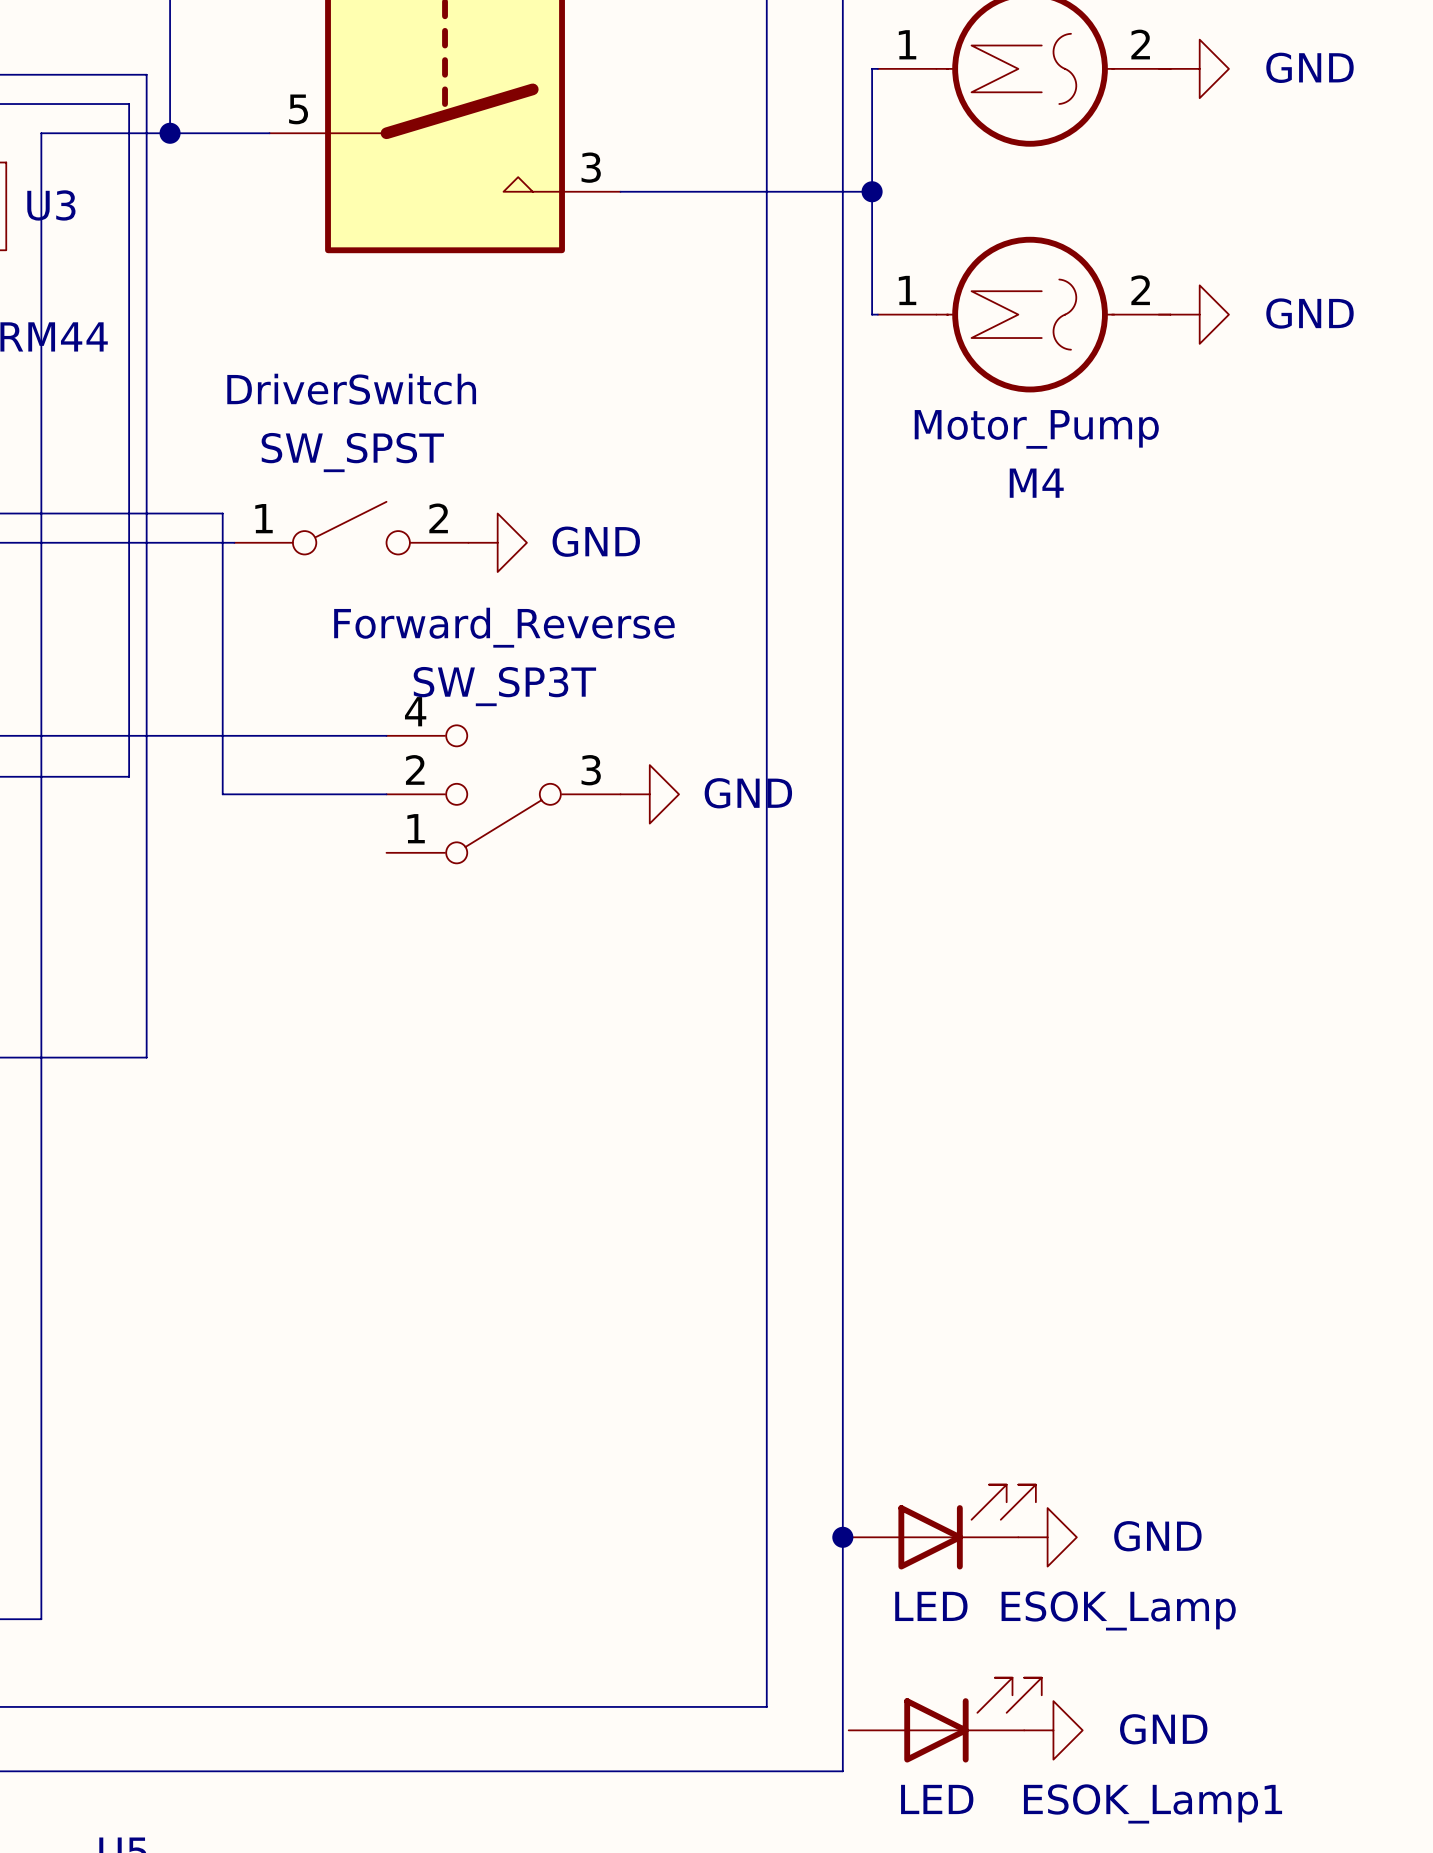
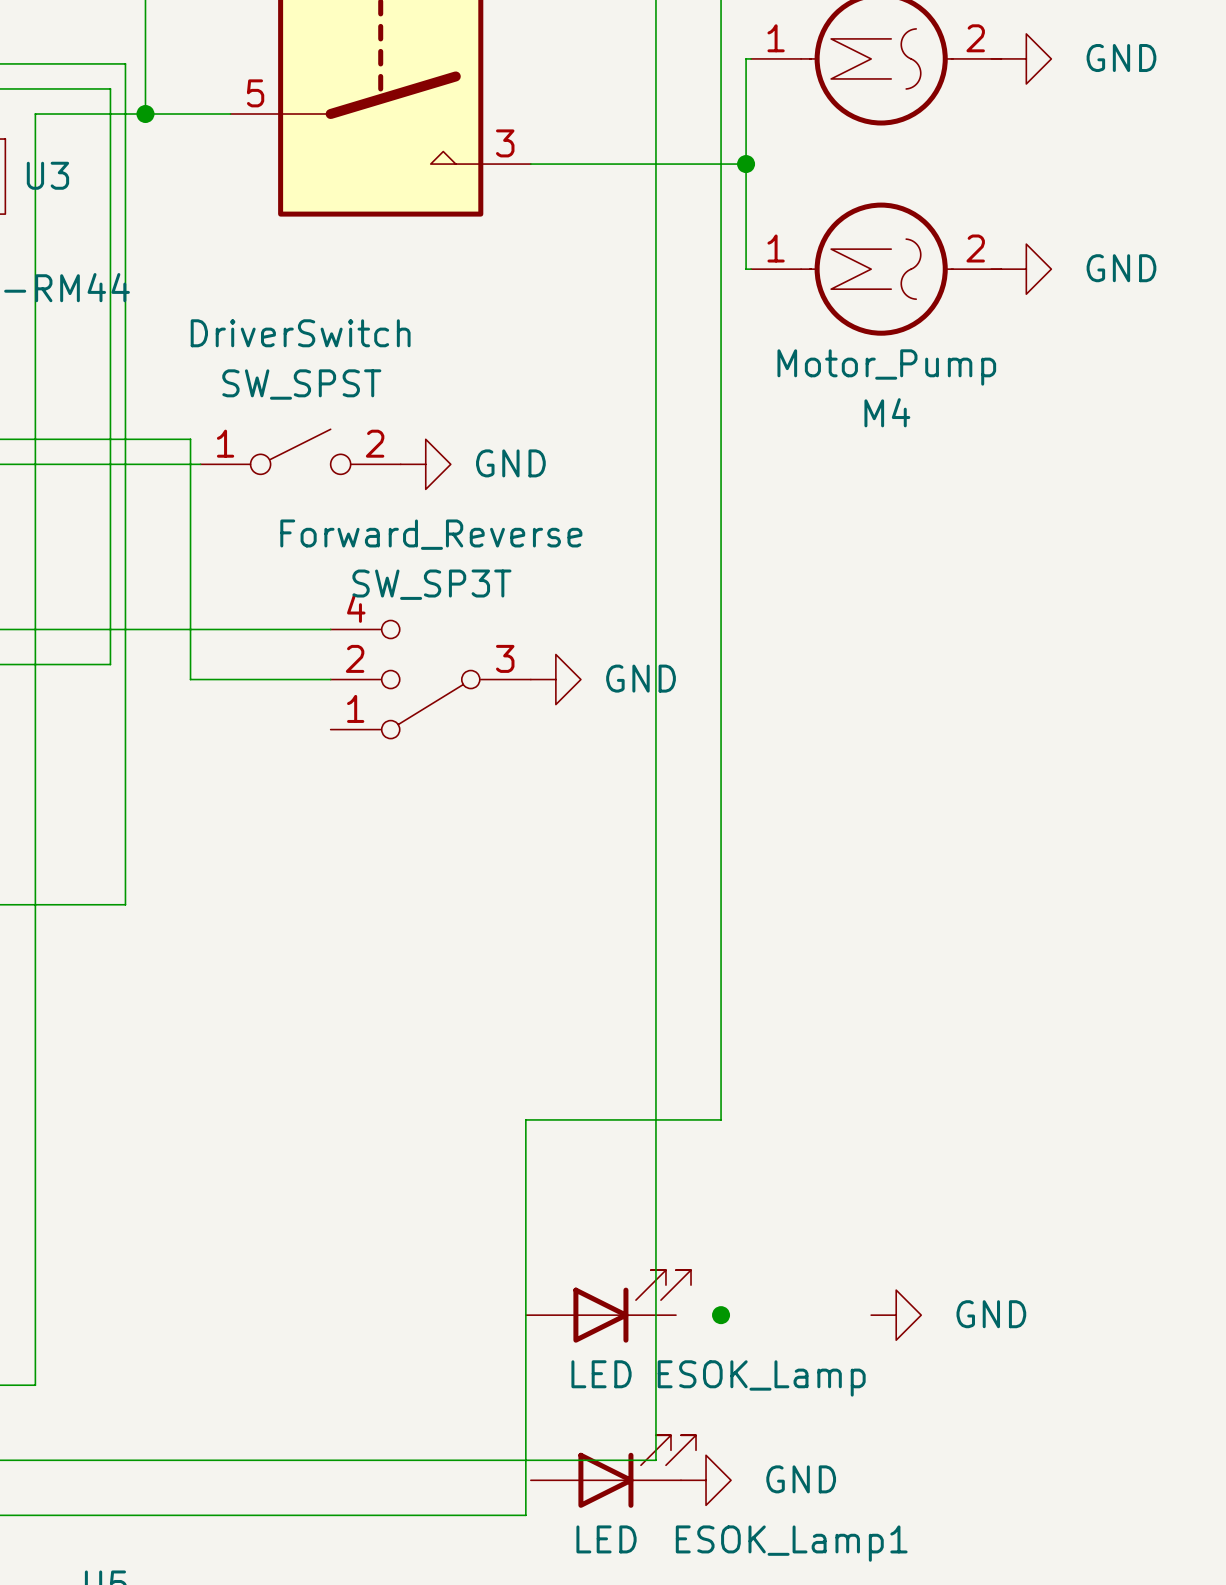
wire: (842, 1309) (842, 1771) (614, 1771) -> (721, 1119) (525, 1119) (525, 1515)
ESOK_Lamp position: (939, 1527) -> (608, 1306)
ESOK_Lamp1 position: (945, 1720) -> (613, 1471)
power symbol position: GND (1053, 1730) -> GND (706, 1480)

